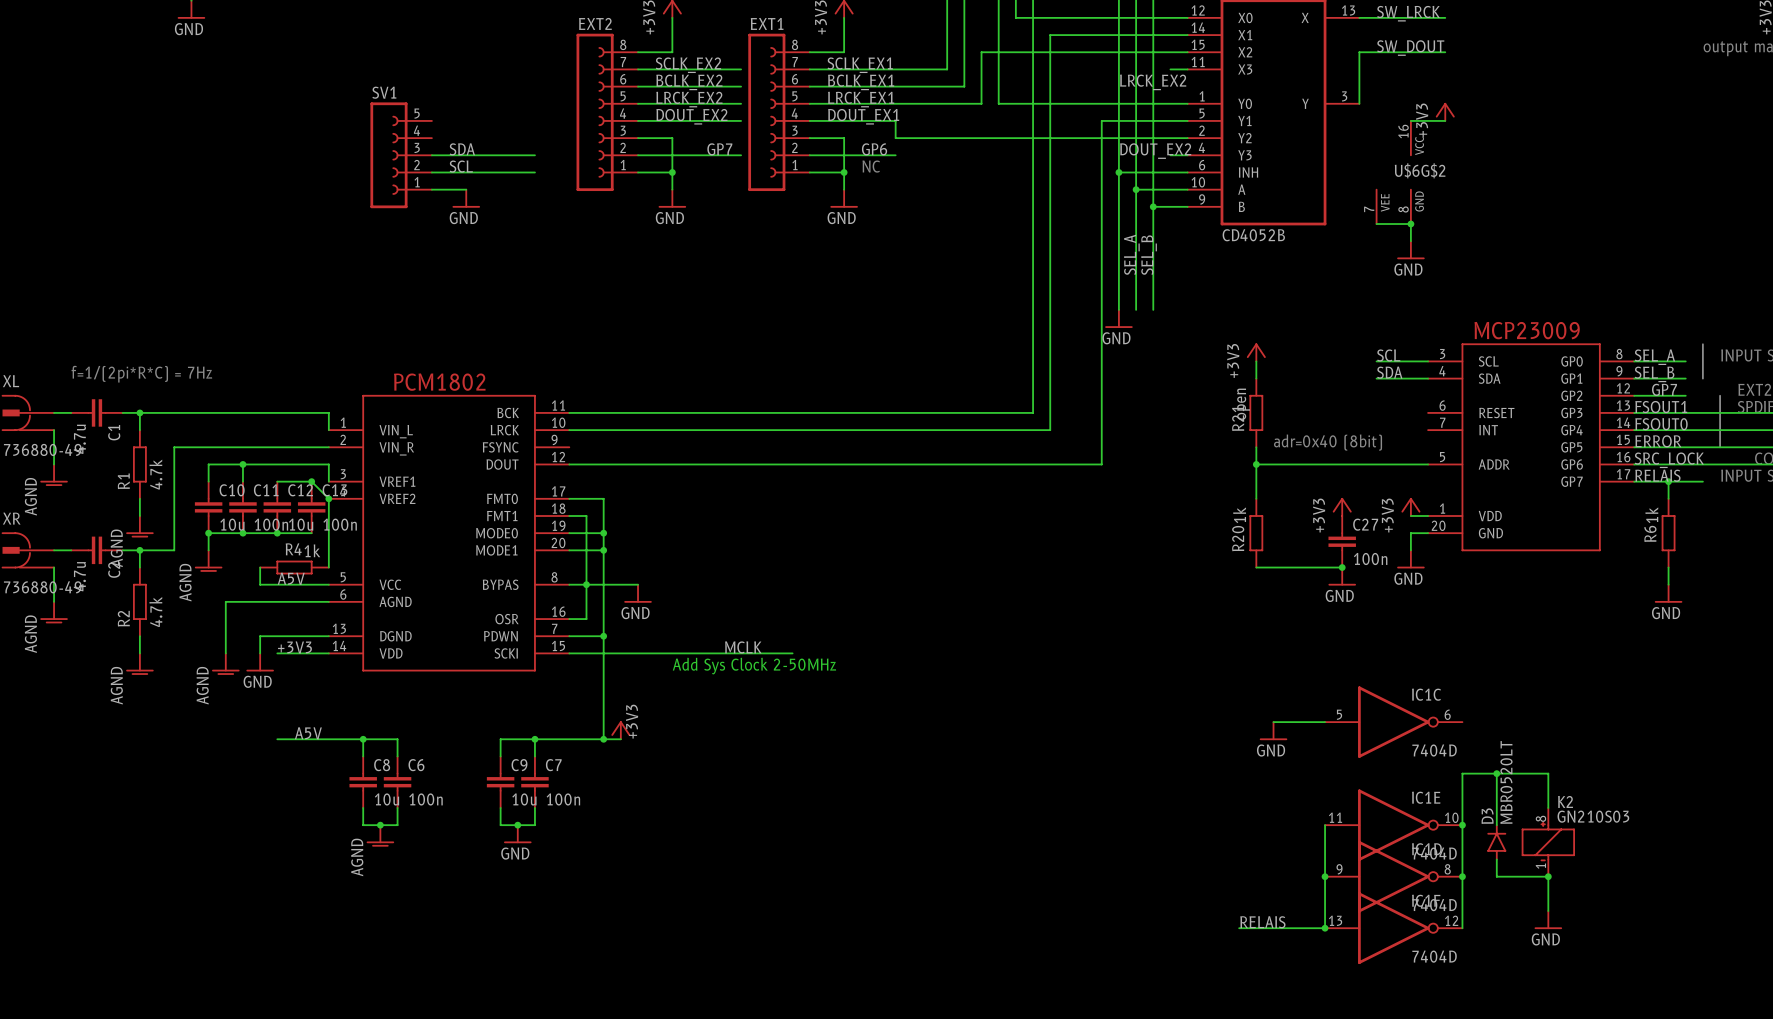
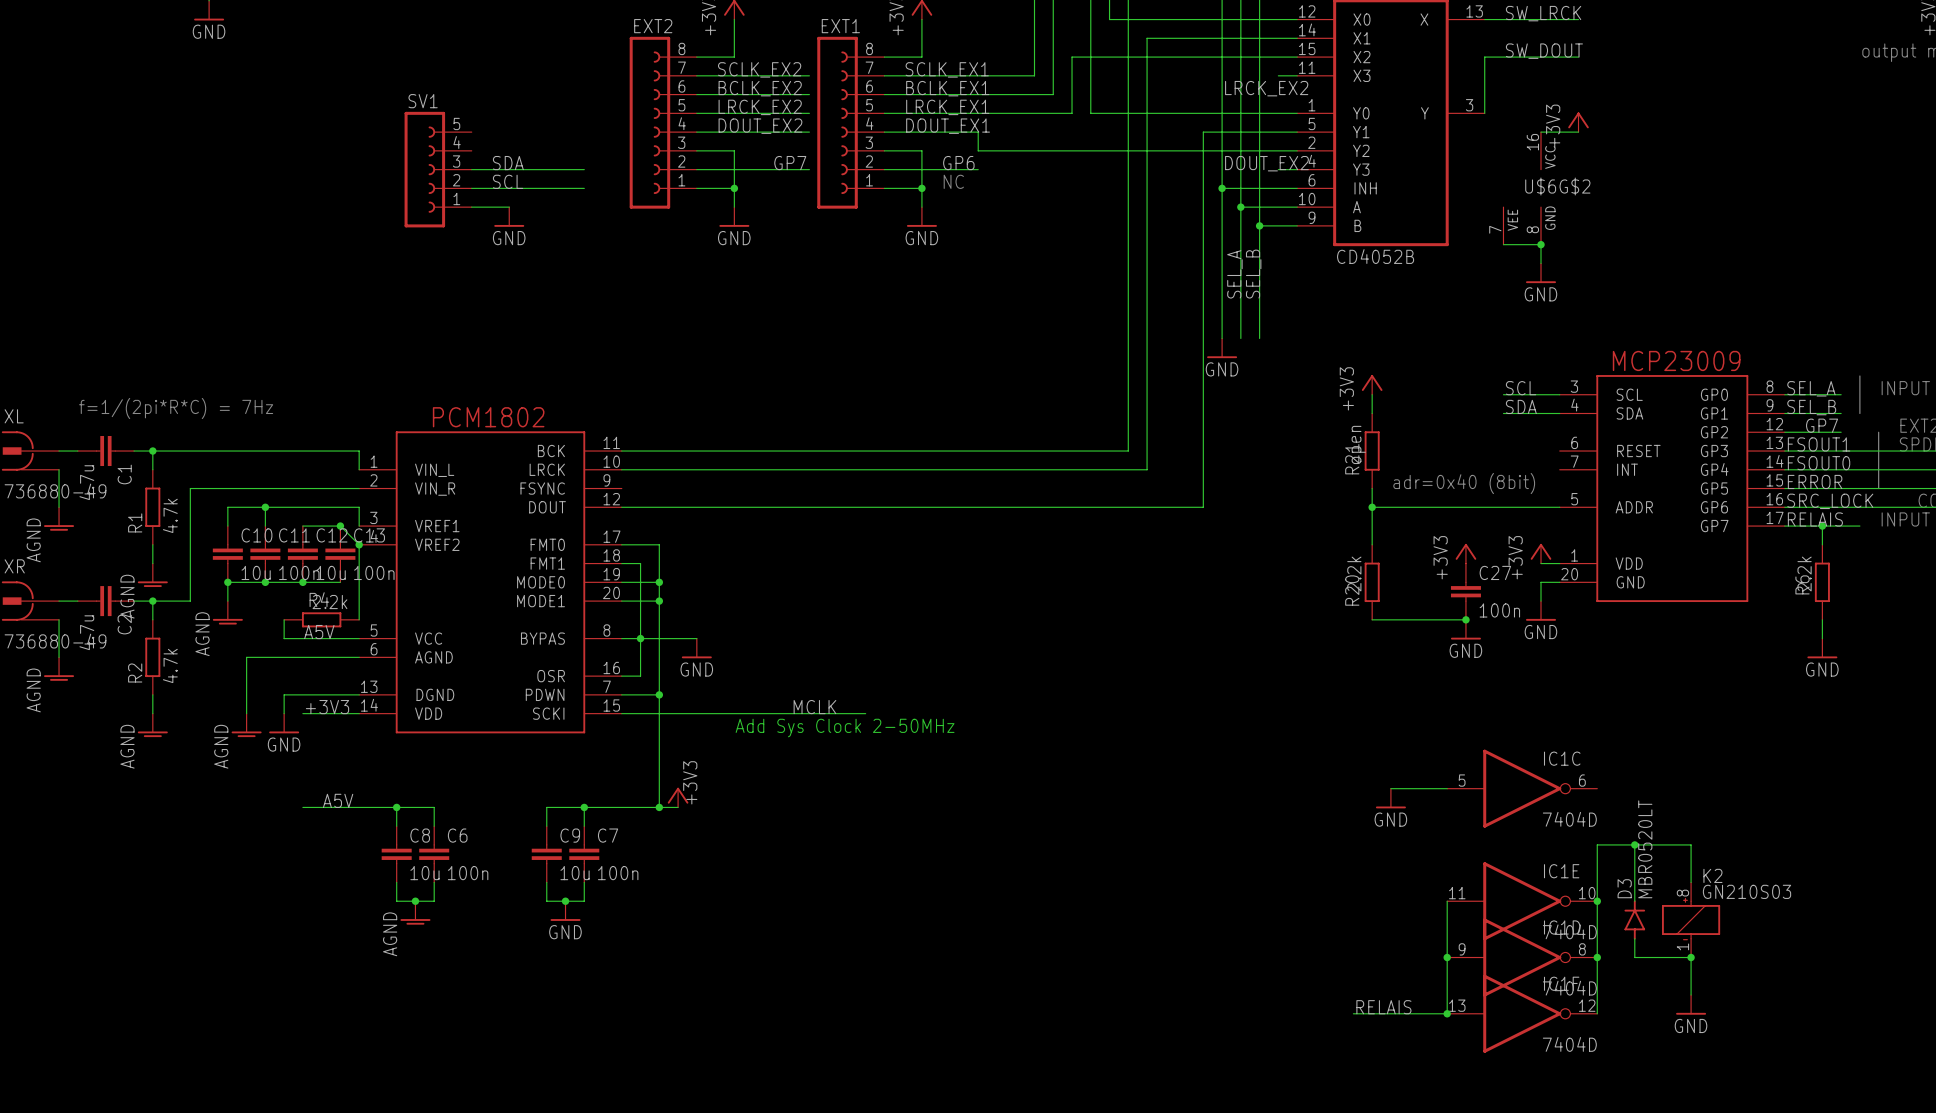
R20 value: 1k (1239, 515) -> 2.2k (1354, 574)
R6 value: 1k (1651, 515) -> 2.2k (1804, 574)
R4 value: 1k (312, 550) -> 2.2k (329, 602)

